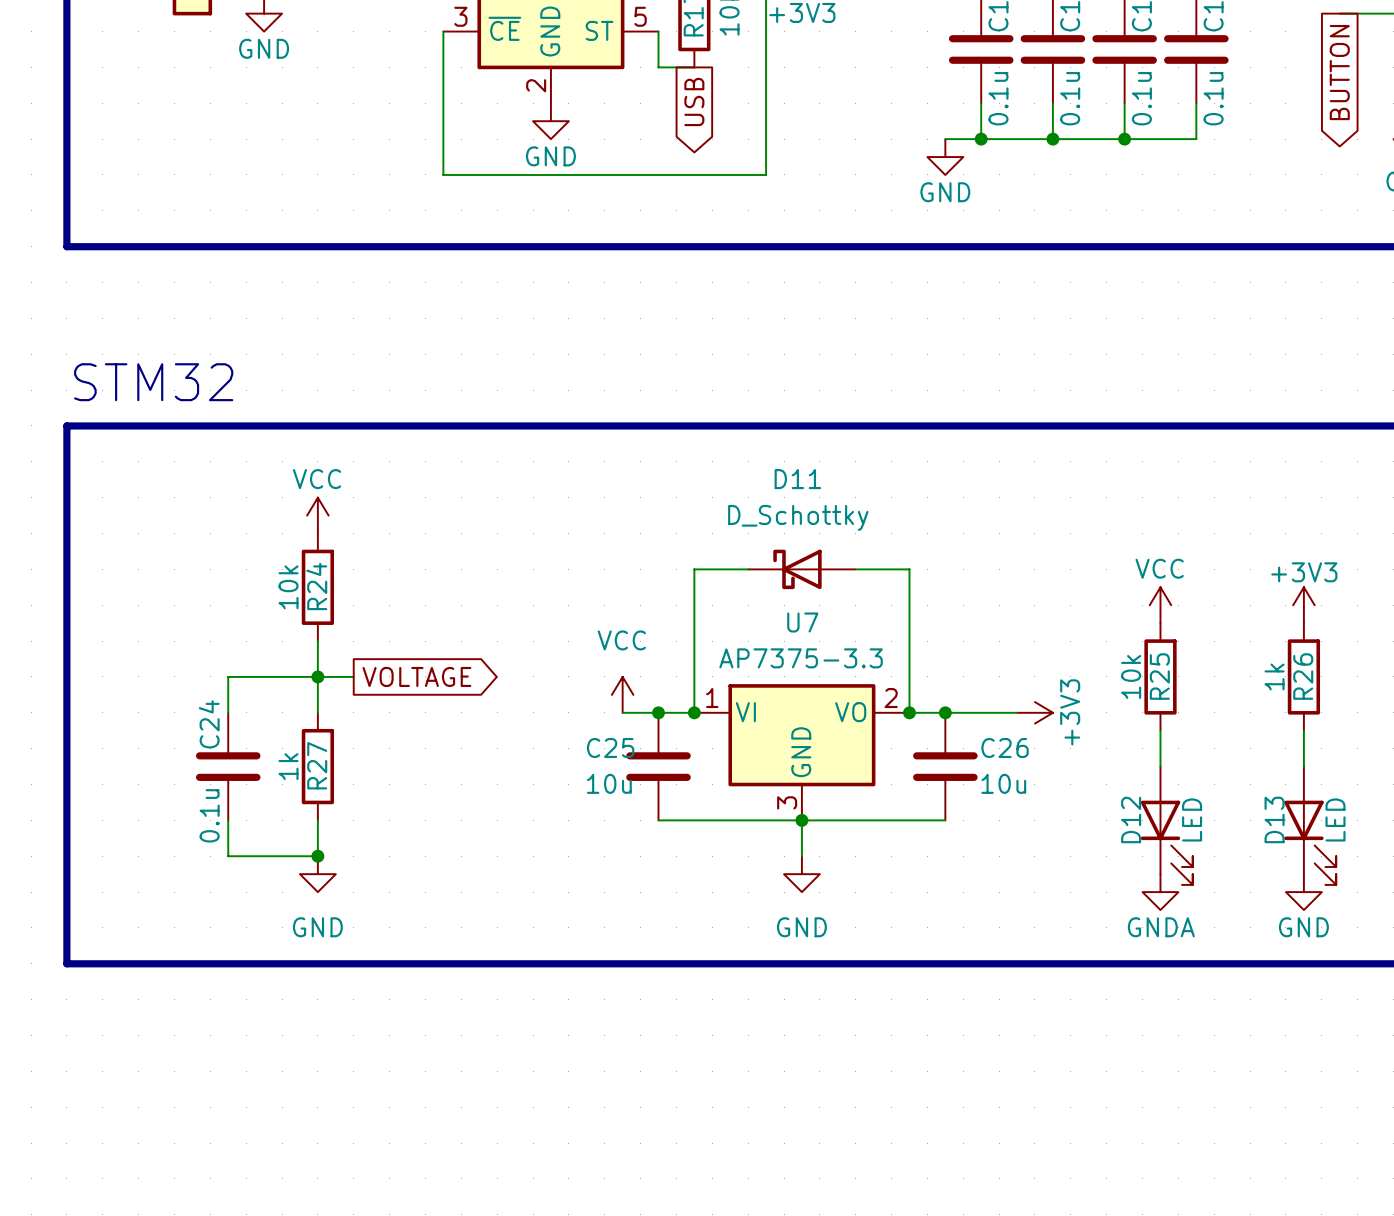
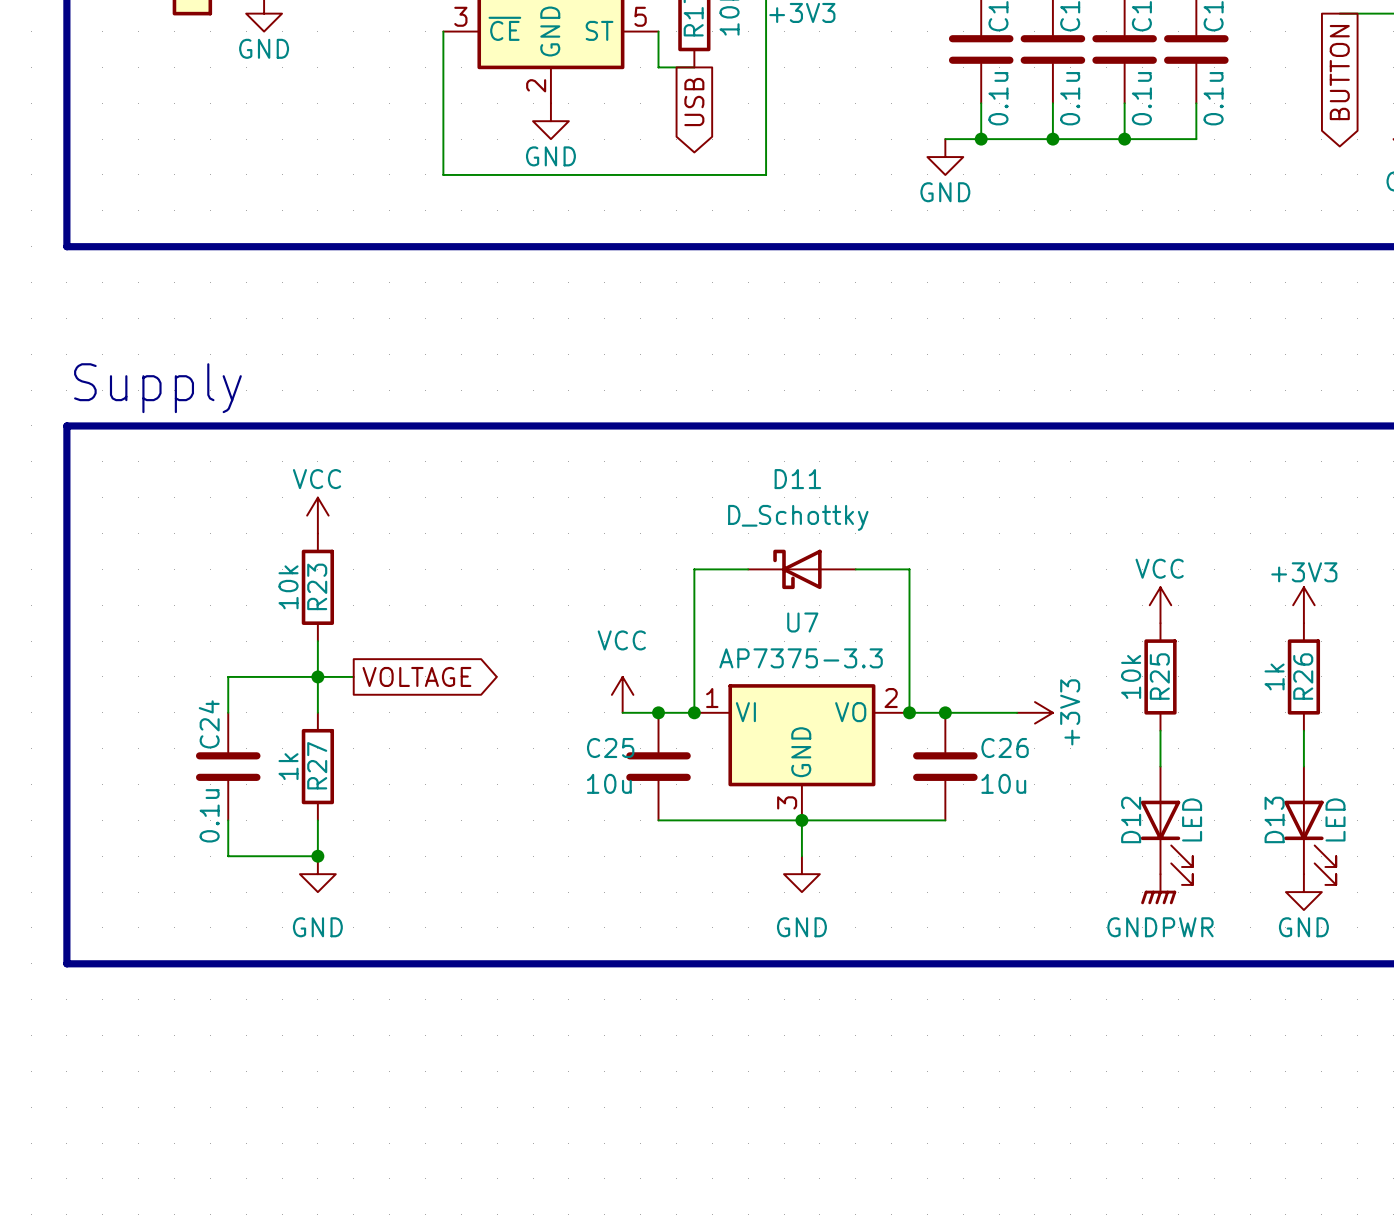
text: STM32 (153, 382) -> Supply (157, 388)
R24 name: R24 (316, 586) -> R23 (317, 586)
power symbol: GNDA (1160, 892) -> GNDPWR (1158, 889)

